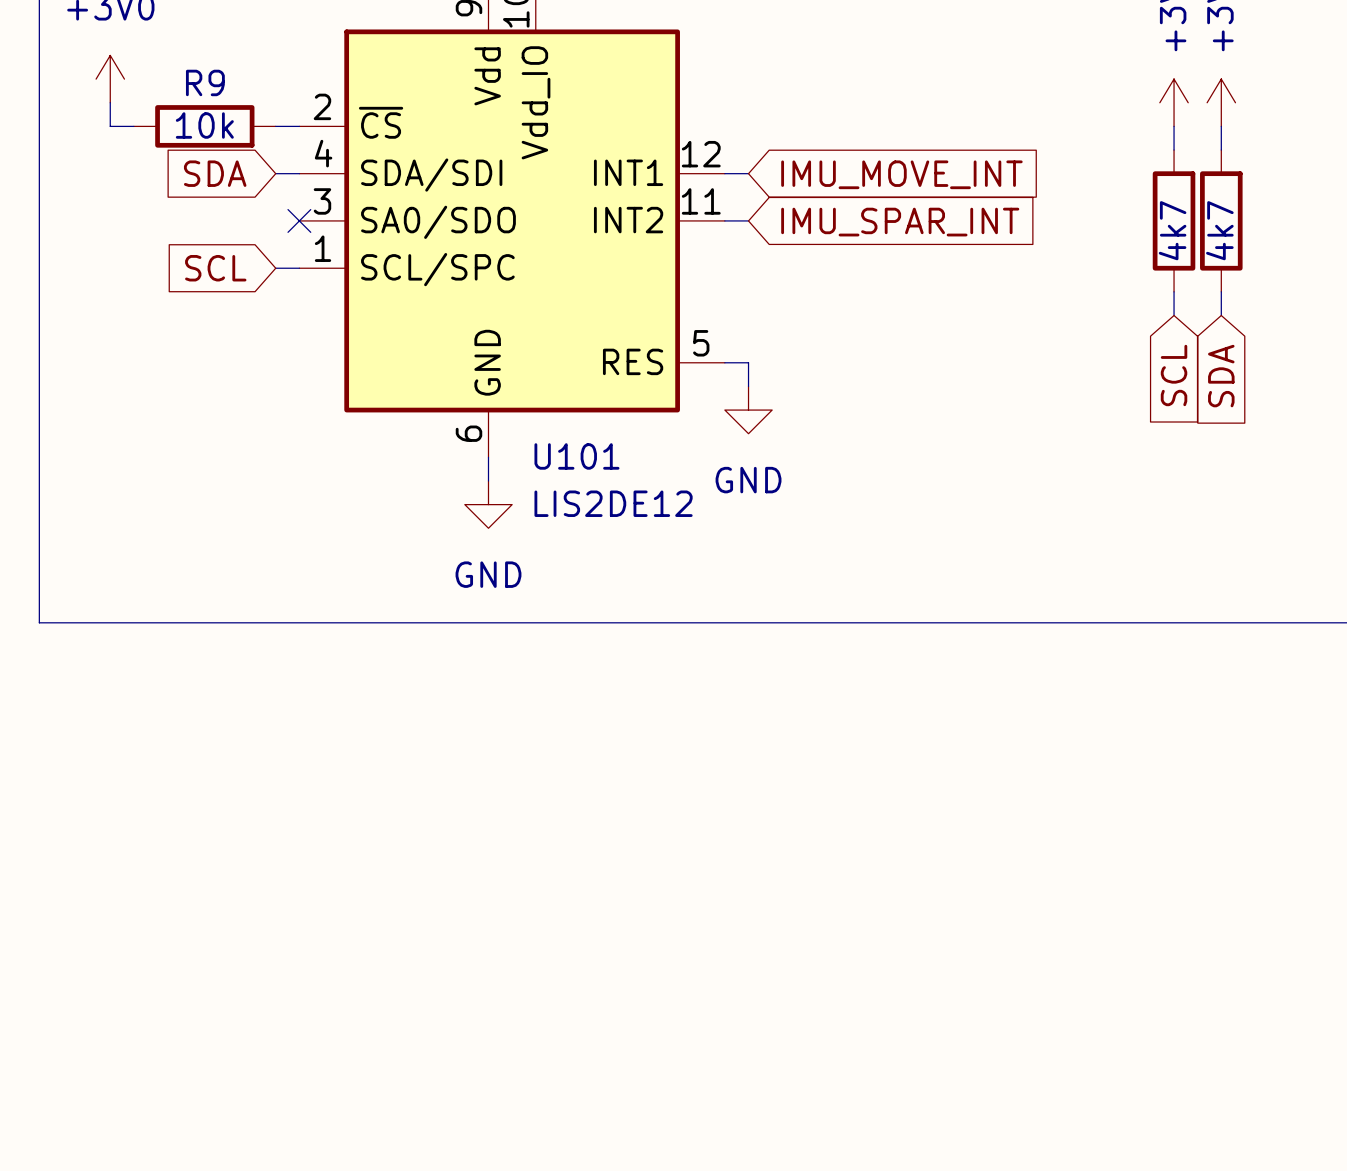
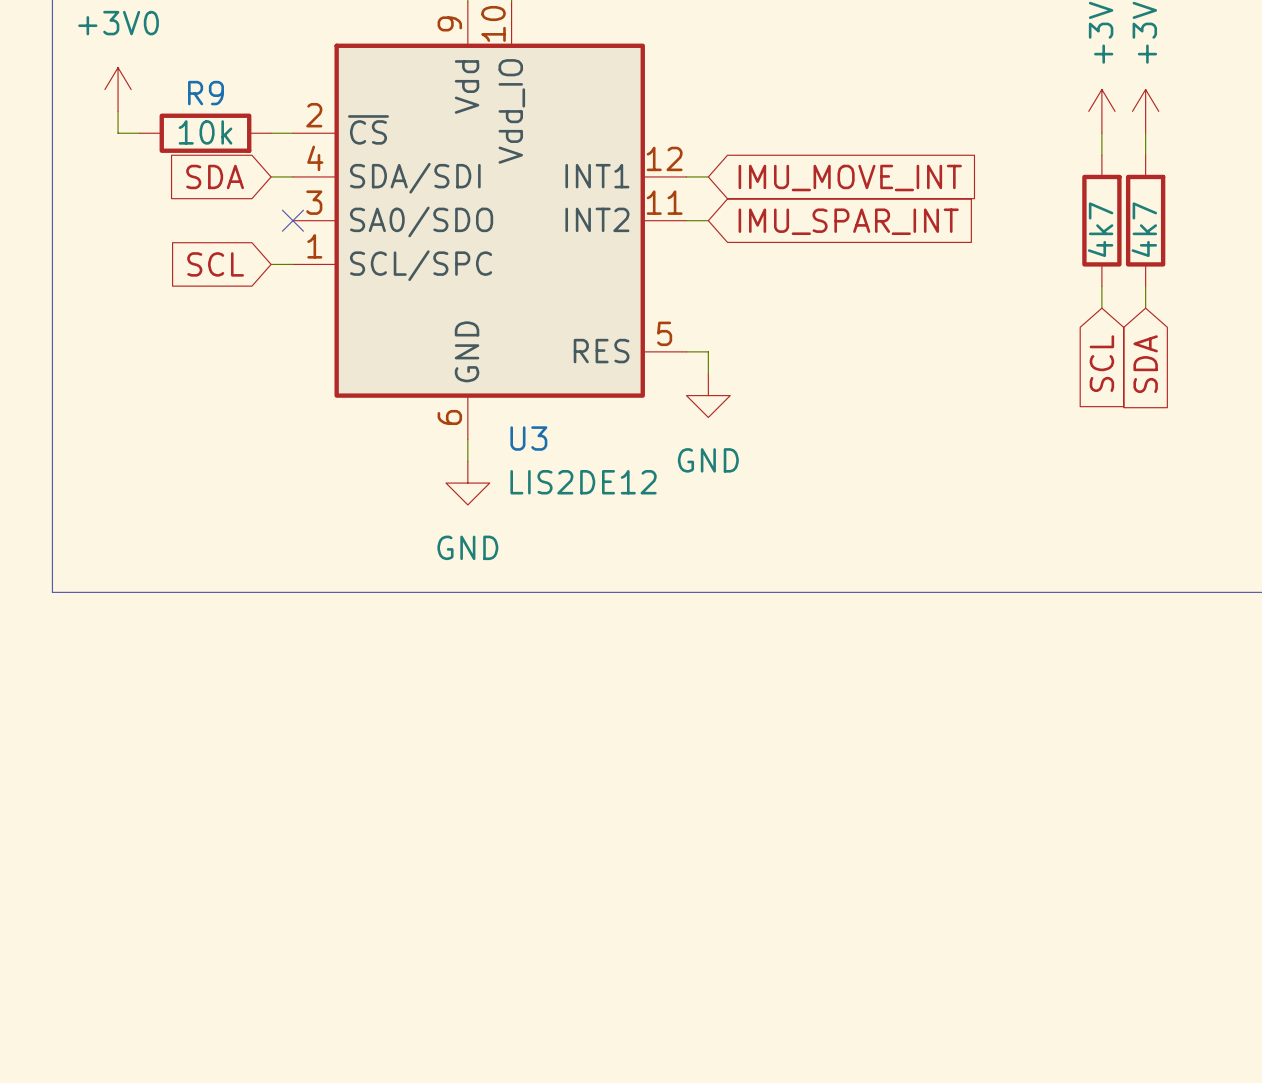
U101 name: U101 (576, 456) -> U3 (528, 438)

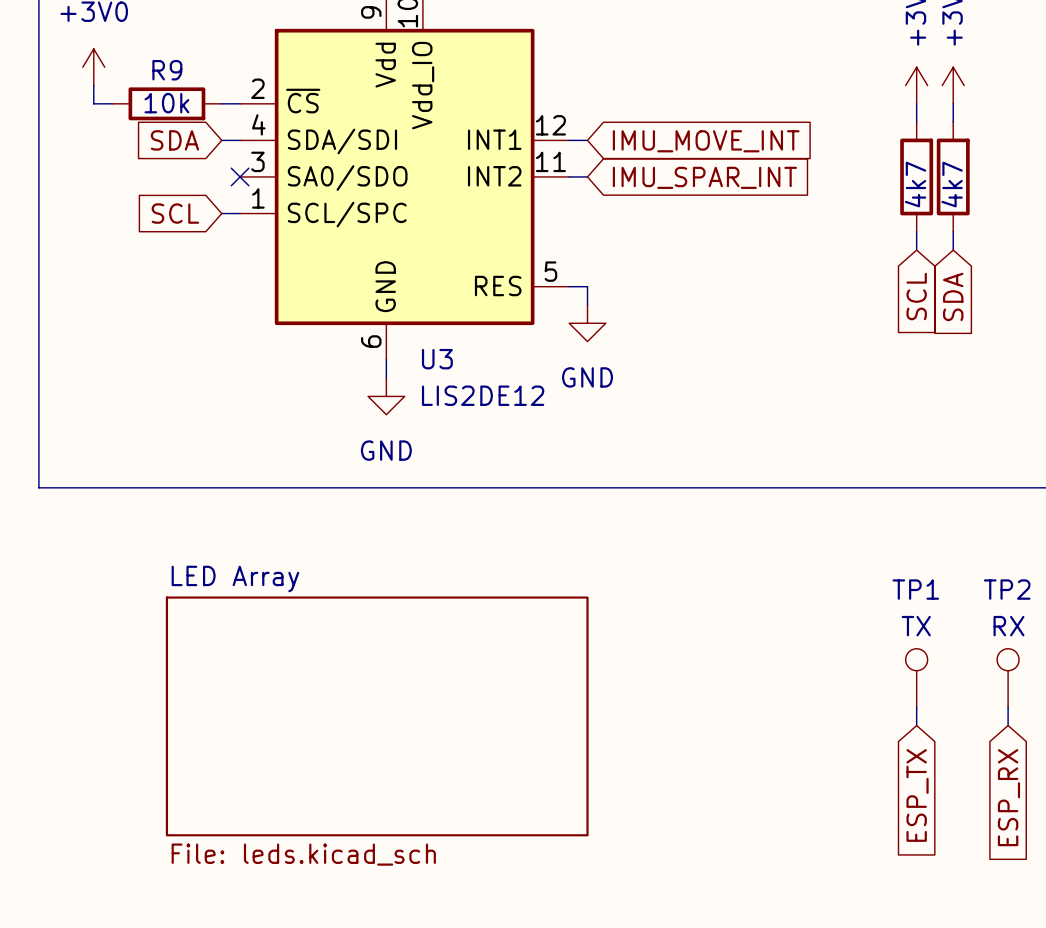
TP1: none -> TX (916, 678)
TP2: none -> RX (1008, 678)
wire: none -> (916, 707) (916, 725)
wire: none -> (1008, 707) (1008, 725)
sheet LED Array: none -> File: leds.kicad_sch (377, 716)
global label: none -> ESP_TX (917, 795)
global label: none -> ESP_RX (1008, 797)

